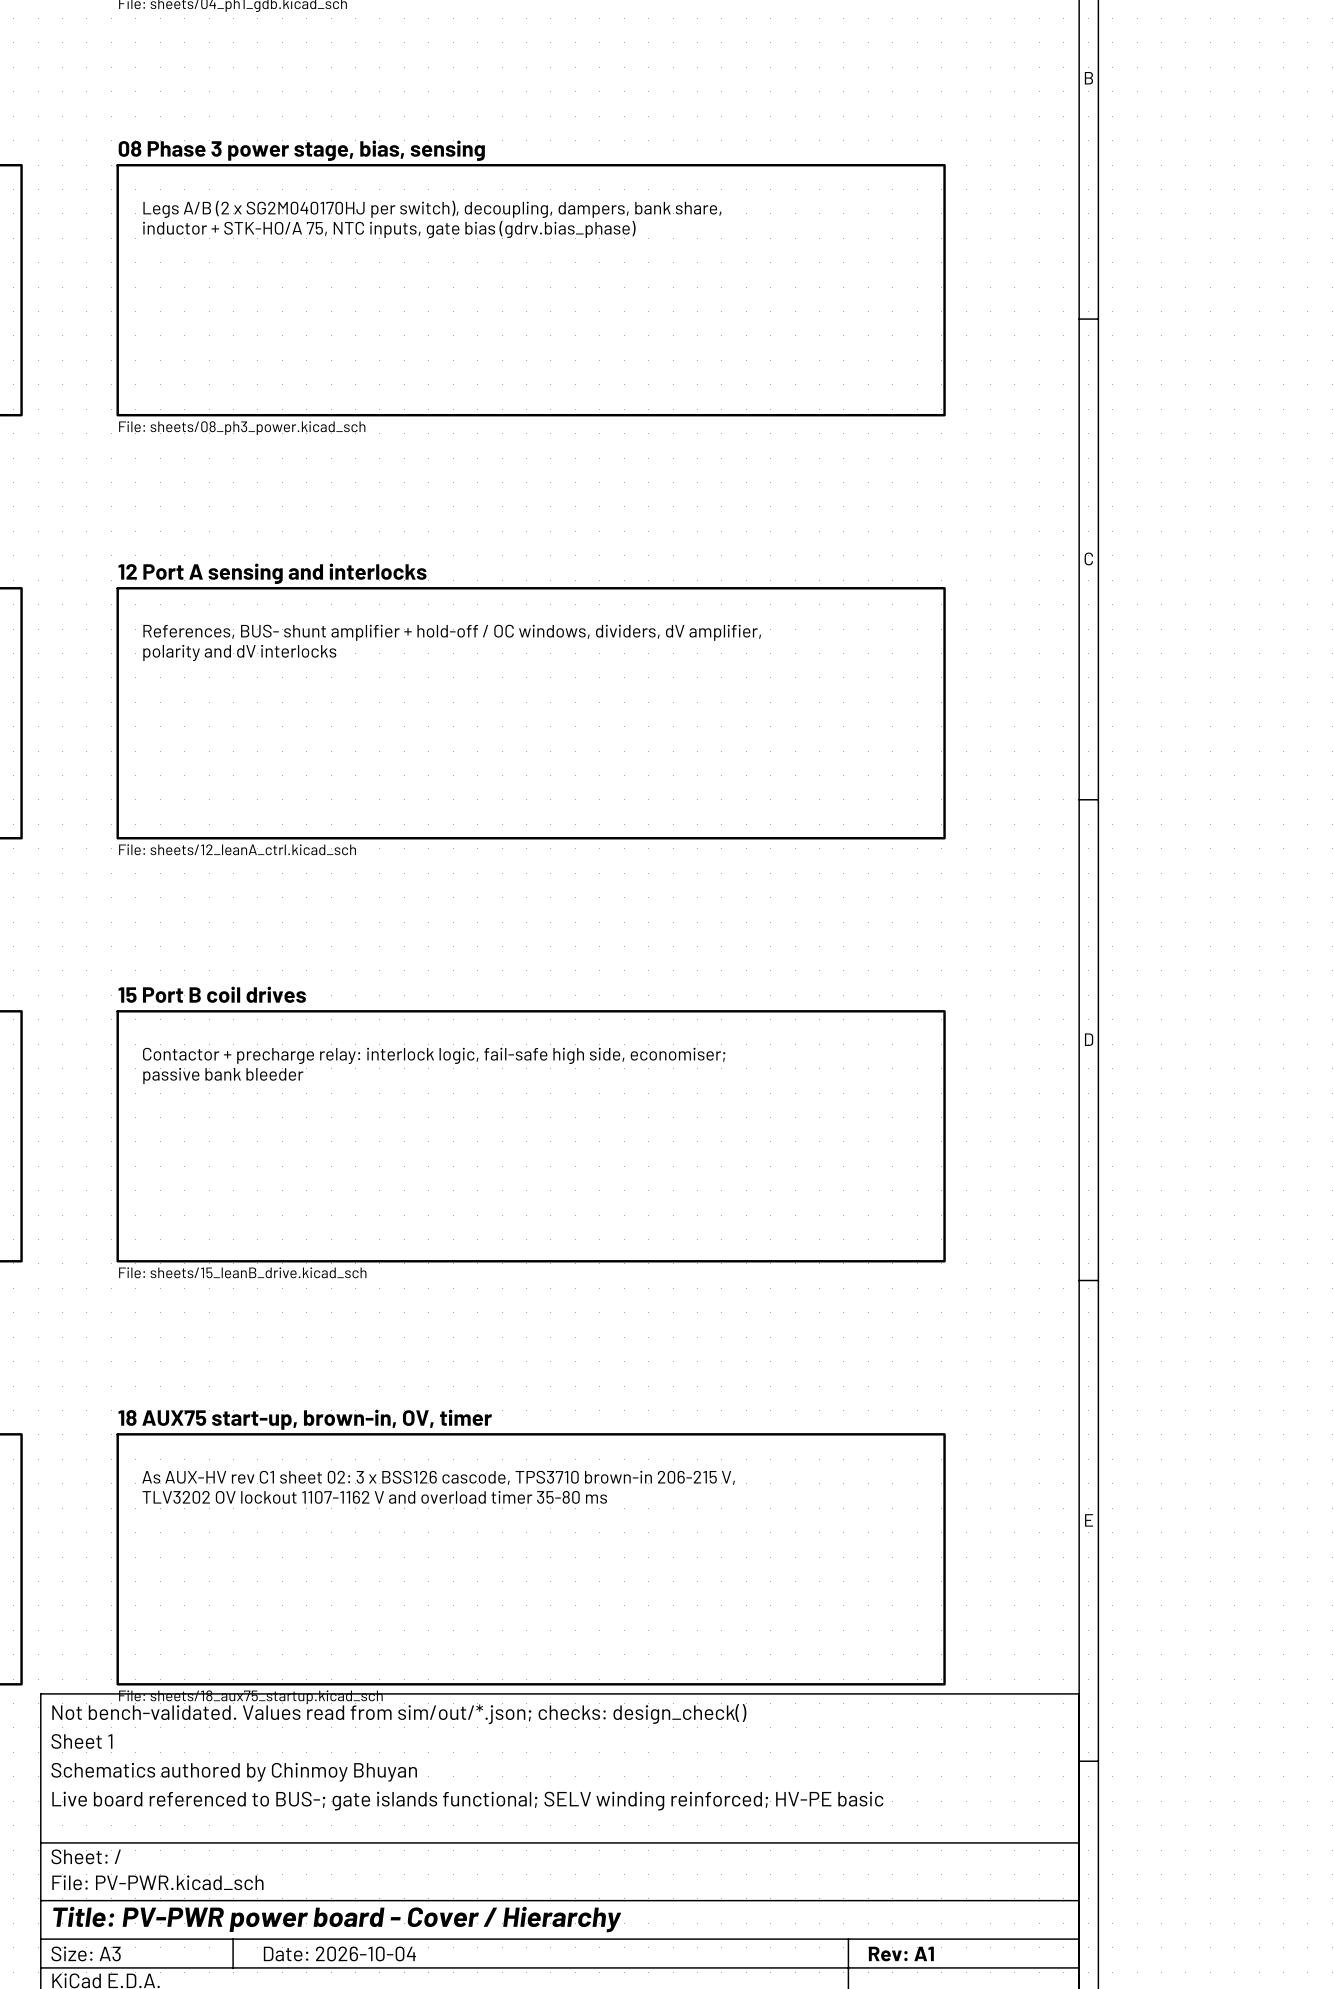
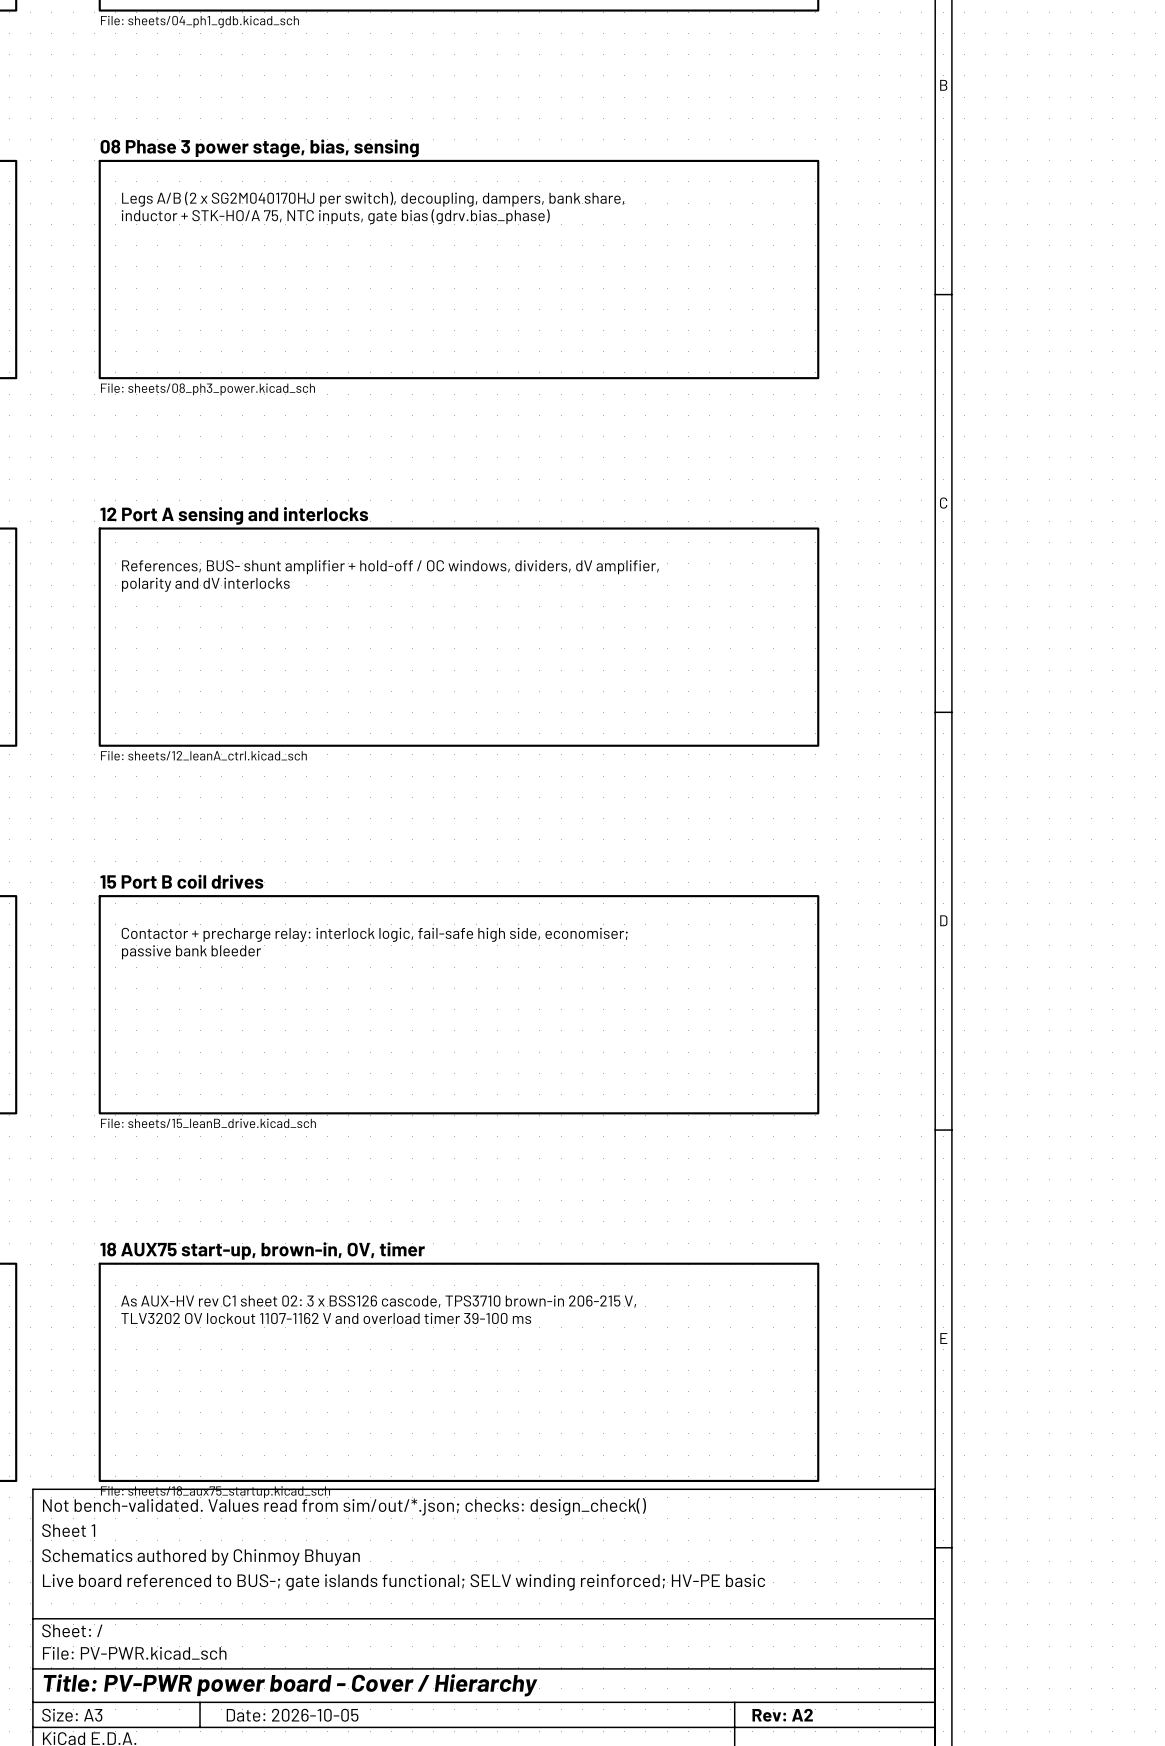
text: TLV3202 OV lockout 1107-1162 V and overload timer 35-80 ms (374, 1497) -> TLV3202 OV lockout 1107-1162 V and overload timer 39-100 ms (326, 1318)
title block: Date: 2026-10-04 (339, 1953) -> Date: 2026-10-05 (292, 1715)
title block: Rev: A1 (901, 1954) -> Rev: A2 (782, 1715)

